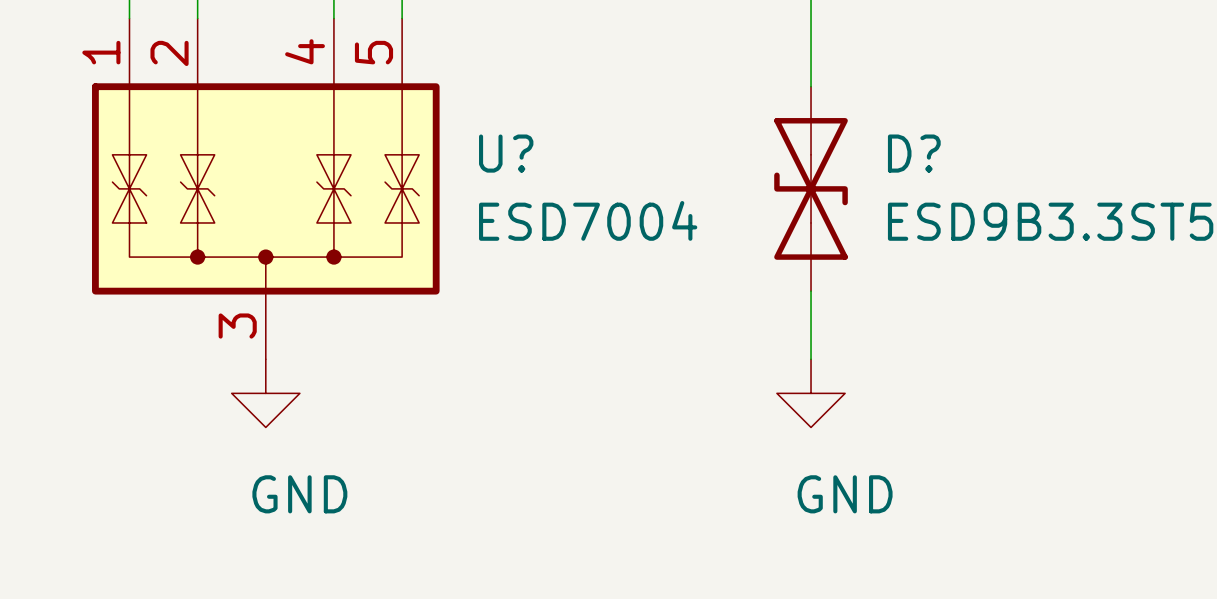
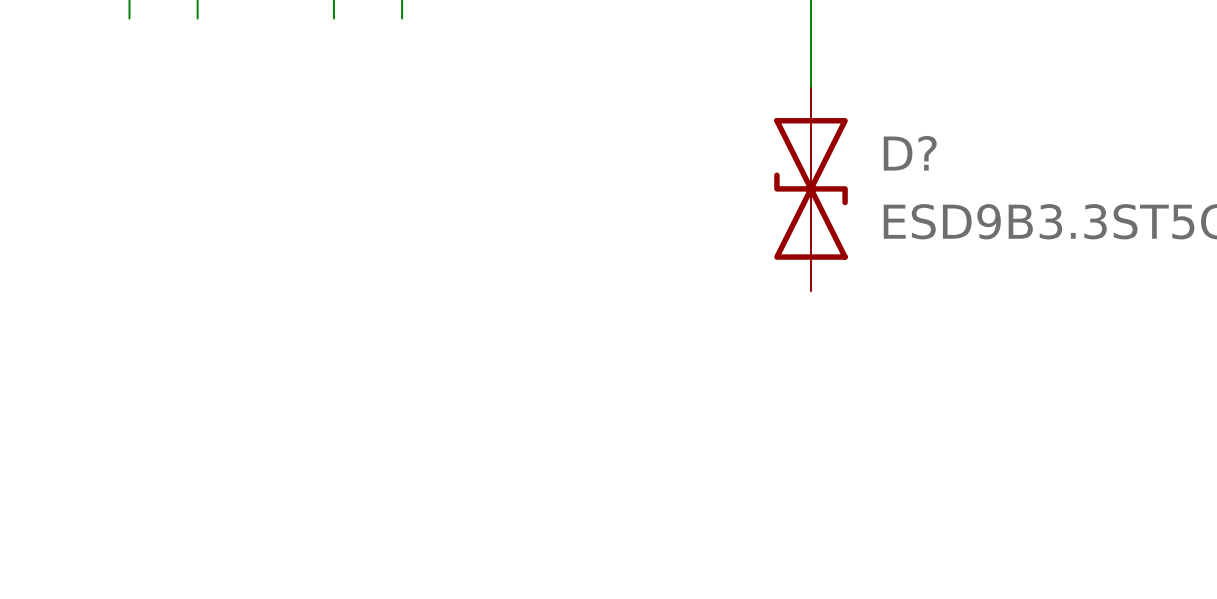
U?: ESD7004 (265, 188) -> none
wire: (811, 291) (811, 359) -> none
power symbol: GND (265, 393) -> none
power symbol: GND (811, 393) -> none

